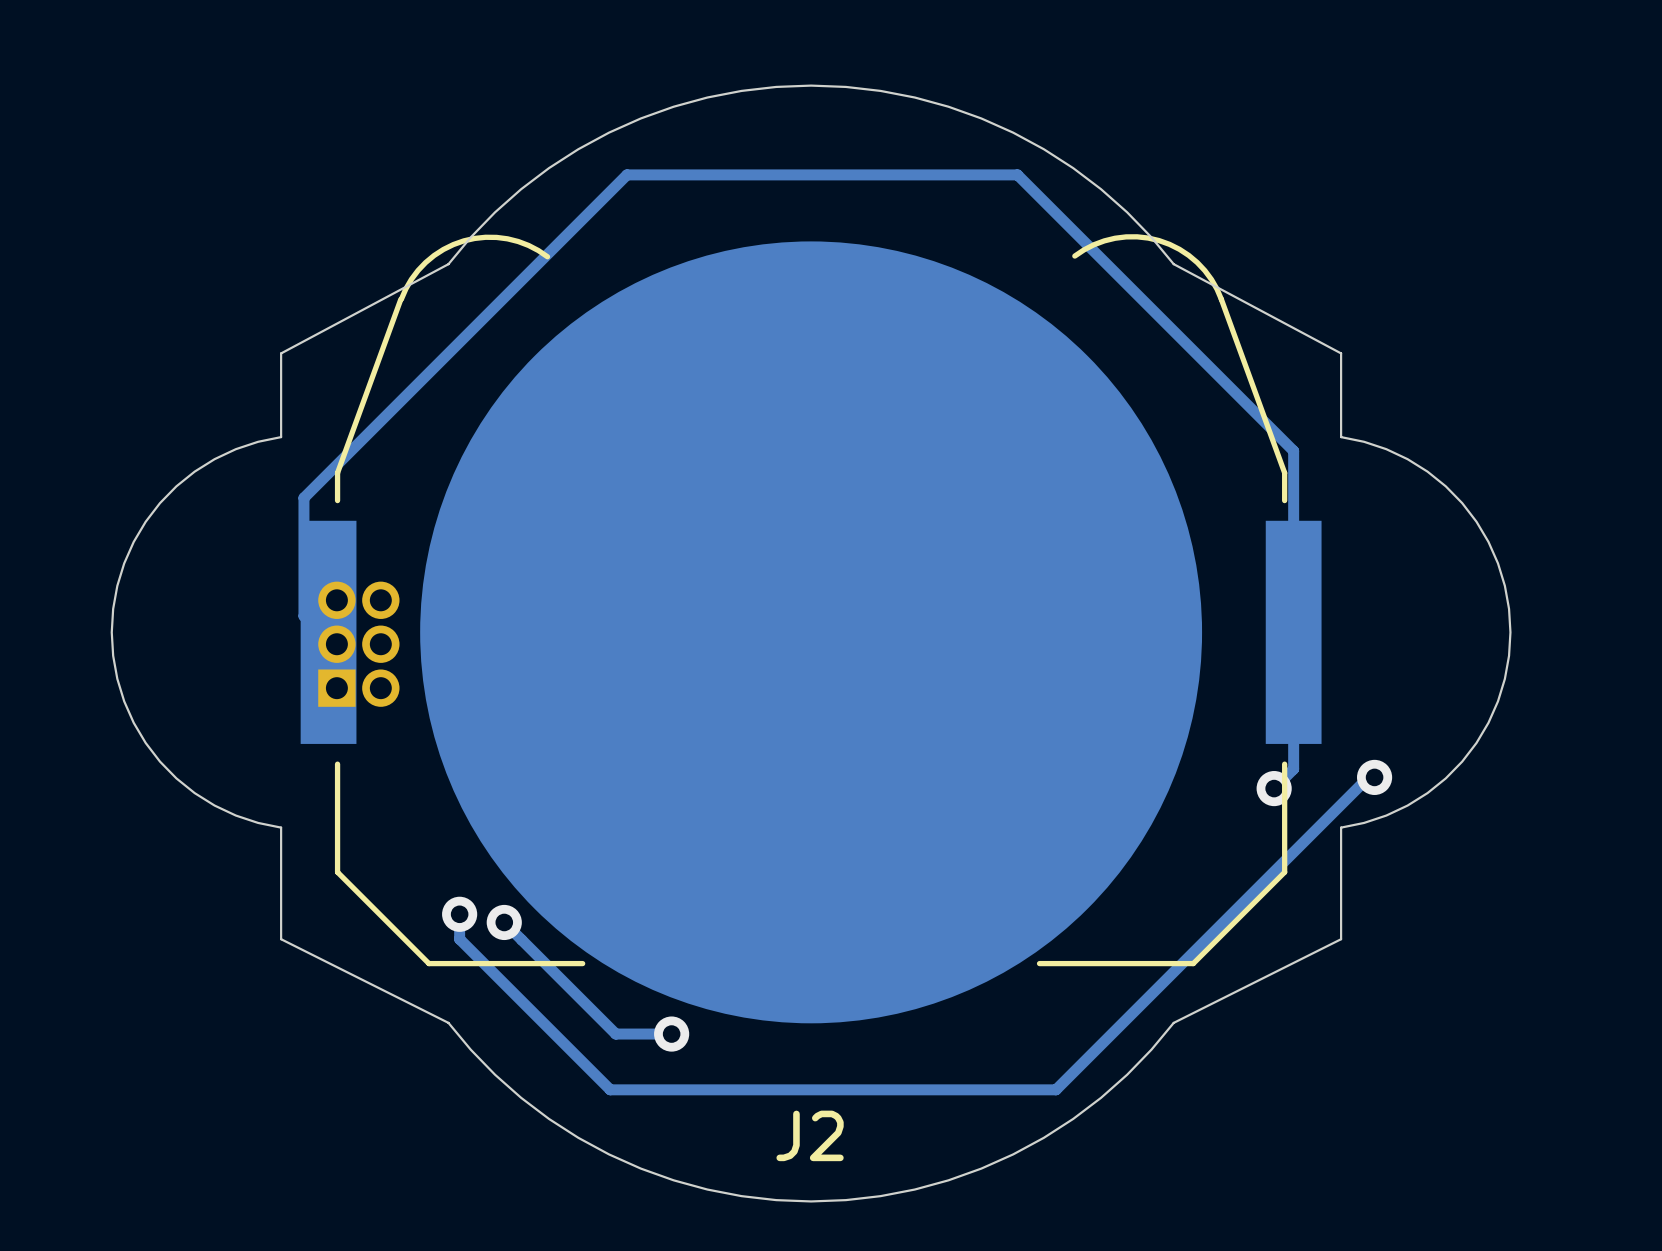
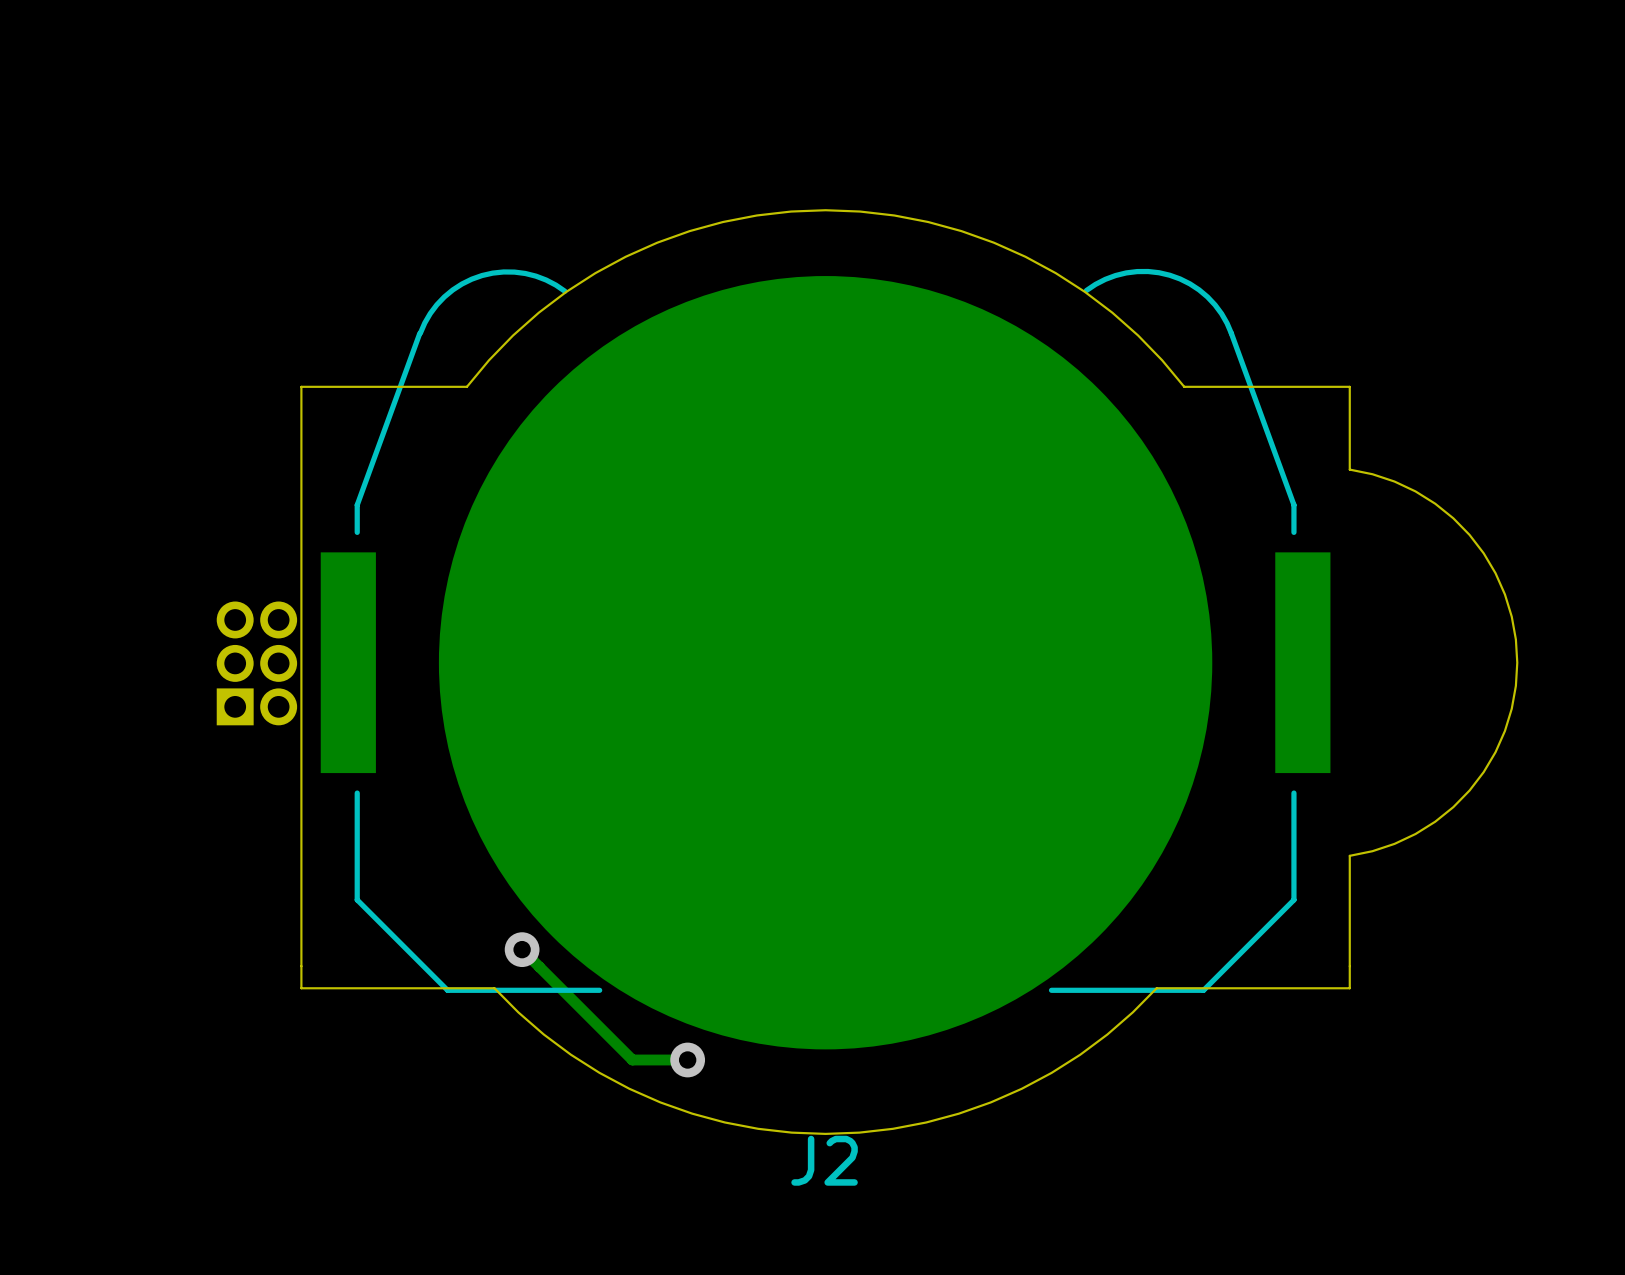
board edge: (1341, 353) (1173, 264) (1151, 237) (1101, 189) (1073, 168) (1013, 132) (948, 106) (914, 97) (880, 90) (811, 85) (776, 86) (707, 97) (673, 106) (609, 132) (548, 168) (521, 189) (470, 237) (448, 264) (281, 353) -> (1349, 386) (1184, 386) (1138, 335) (1112, 312) (1084, 291) (1025, 256) (961, 231) (928, 222) (894, 215) (825, 210) (791, 211) (722, 222) (689, 231) (625, 256) (566, 291) (538, 312) (489, 360) (466, 386) (301, 386)
board edge: (281, 437) (235, 449) (214, 459) (194, 471) (160, 503) (145, 521) (124, 563) (113, 608) (111, 632) (113, 655) (124, 701) (133, 722) (160, 761) (176, 778) (214, 805) (235, 815) (281, 827) -> (301, 469) (301, 855)
track: (310, 622) (303, 616) (303, 497) (627, 174) (1017, 174) (1293, 451) (1293, 769) (1274, 788) -> none
part position: (358, 644) -> (256, 663)
track: (1374, 777) (1368, 777) (1056, 1089) (610, 1089) (459, 939) (459, 914) -> none
via: (1374, 777) -> none
via: (1274, 788) -> none
via: (459, 914) -> none
board edge: (1341, 939) (1173, 1022) (1151, 1049) (1101, 1097) (1043, 1137) (1013, 1154) (981, 1168) (914, 1189) (880, 1196) (811, 1201) (776, 1200) (707, 1189) (673, 1180) (609, 1154) (548, 1118) (521, 1097) (470, 1049) (448, 1022) (281, 939) -> (1349, 966) (1349, 988) (1156, 988) (1107, 1034) (1080, 1054) (1021, 1088) (990, 1102) (926, 1122) (859, 1132) (825, 1133) (758, 1128) (724, 1122) (660, 1102) (629, 1088) (570, 1054) (518, 1012) (494, 988) (301, 988) (301, 966)

